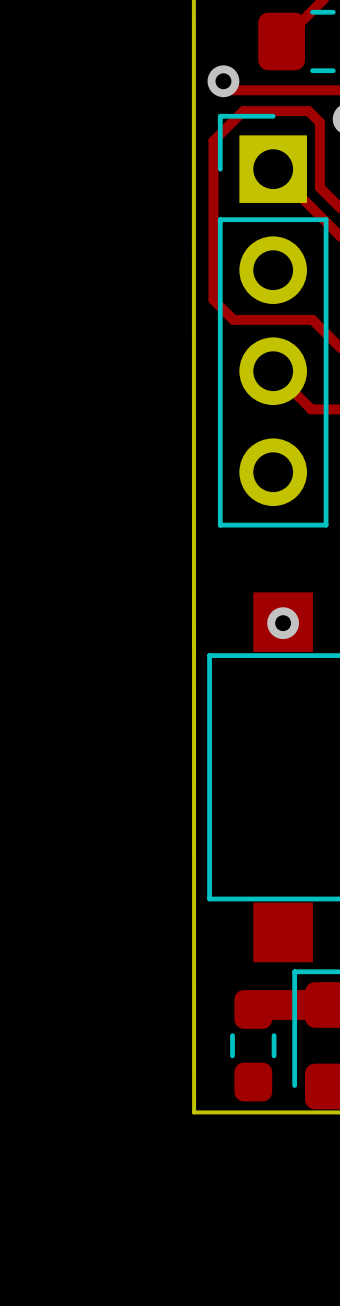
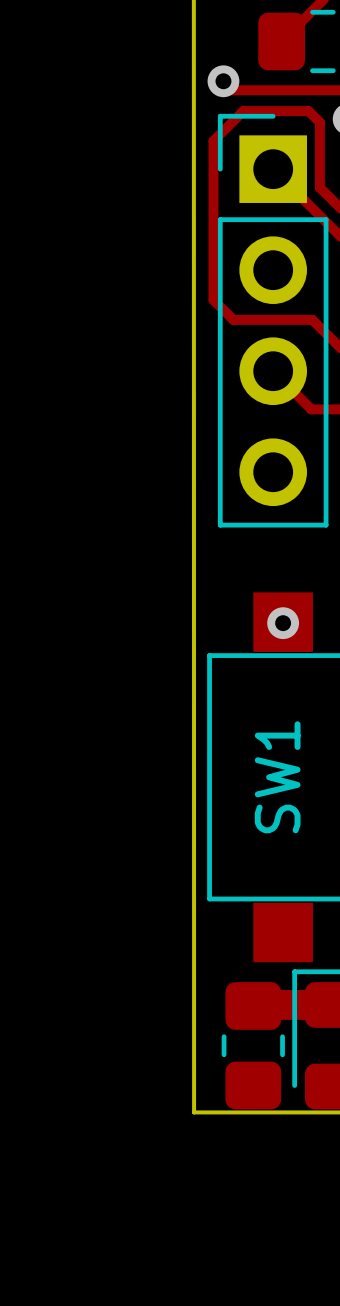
SW1 name: none -> SW1 (277, 777)
part footprint: [230, 990, 277, 1102] -> [221, 982, 285, 1110]

